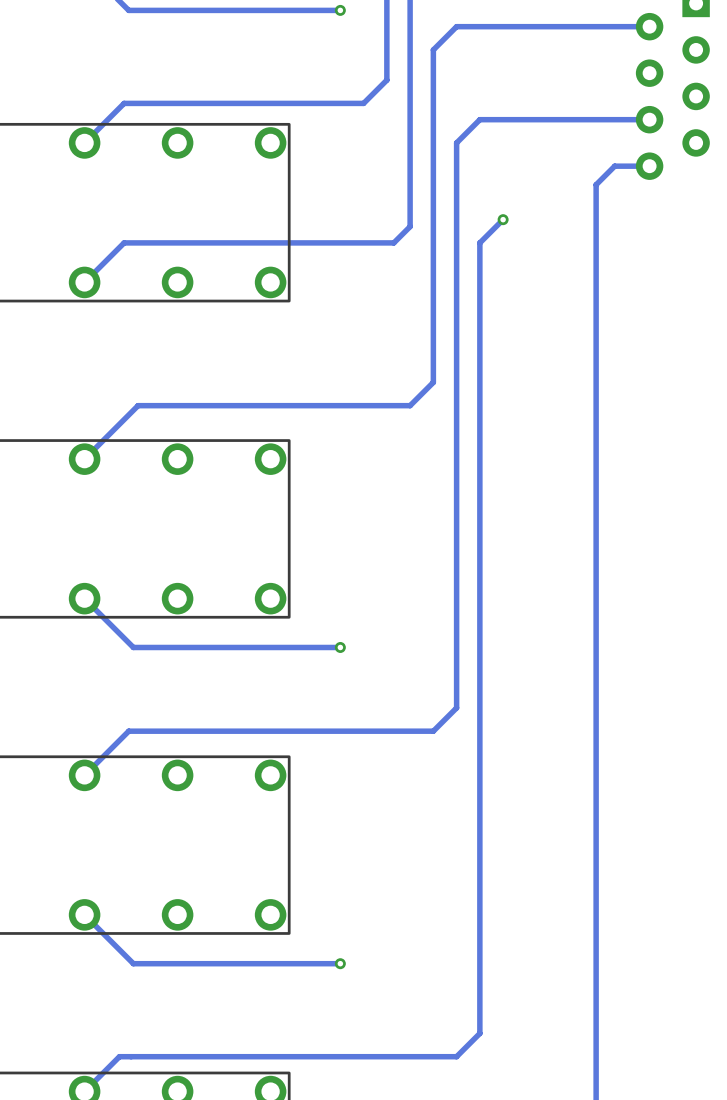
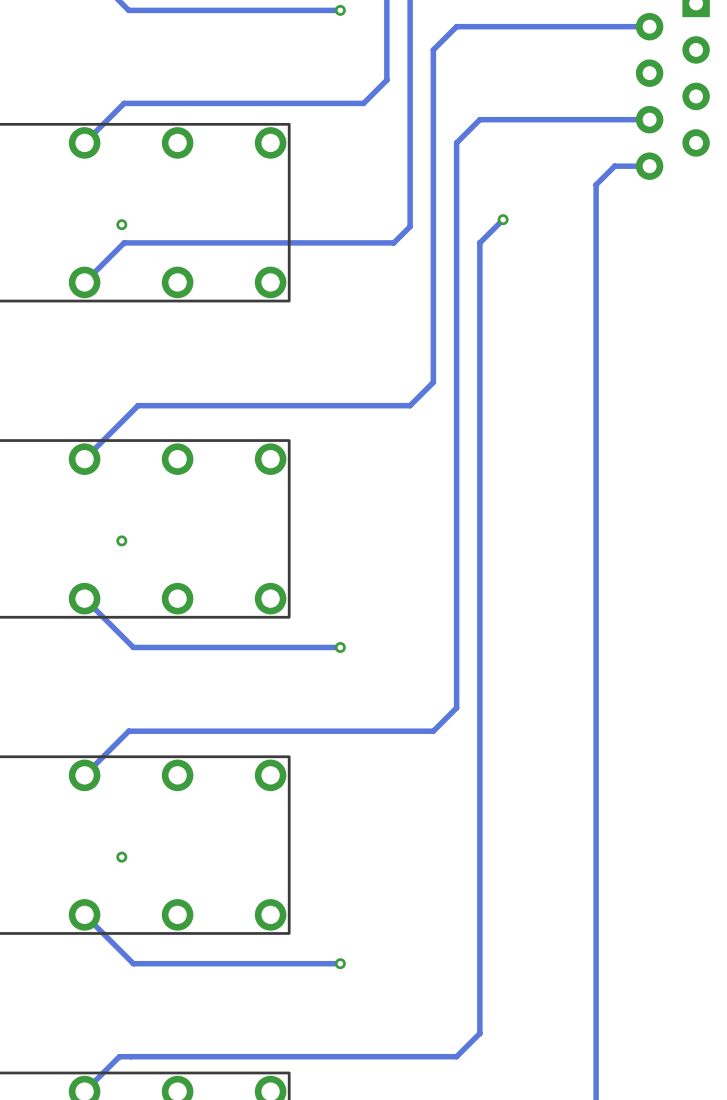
via: none -> (121, 224)
via: none -> (121, 540)
via: none -> (121, 857)

